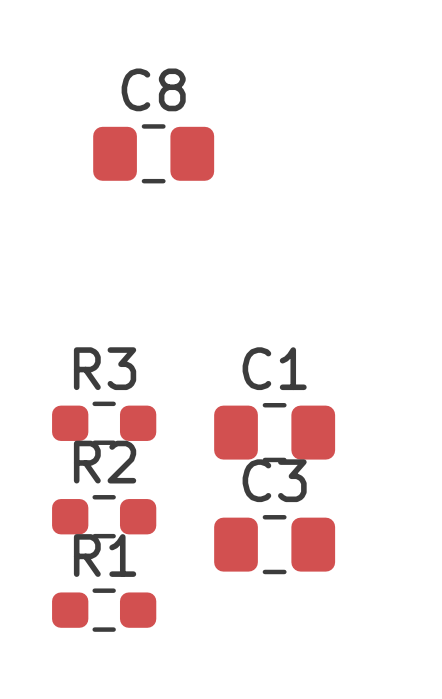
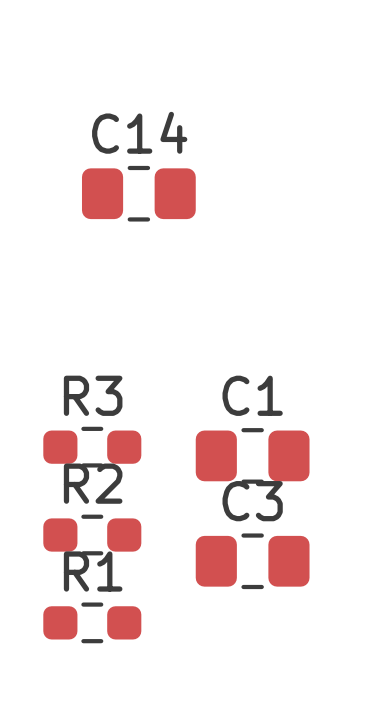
C8 name: C8 (153, 89) -> C14 (139, 132)

